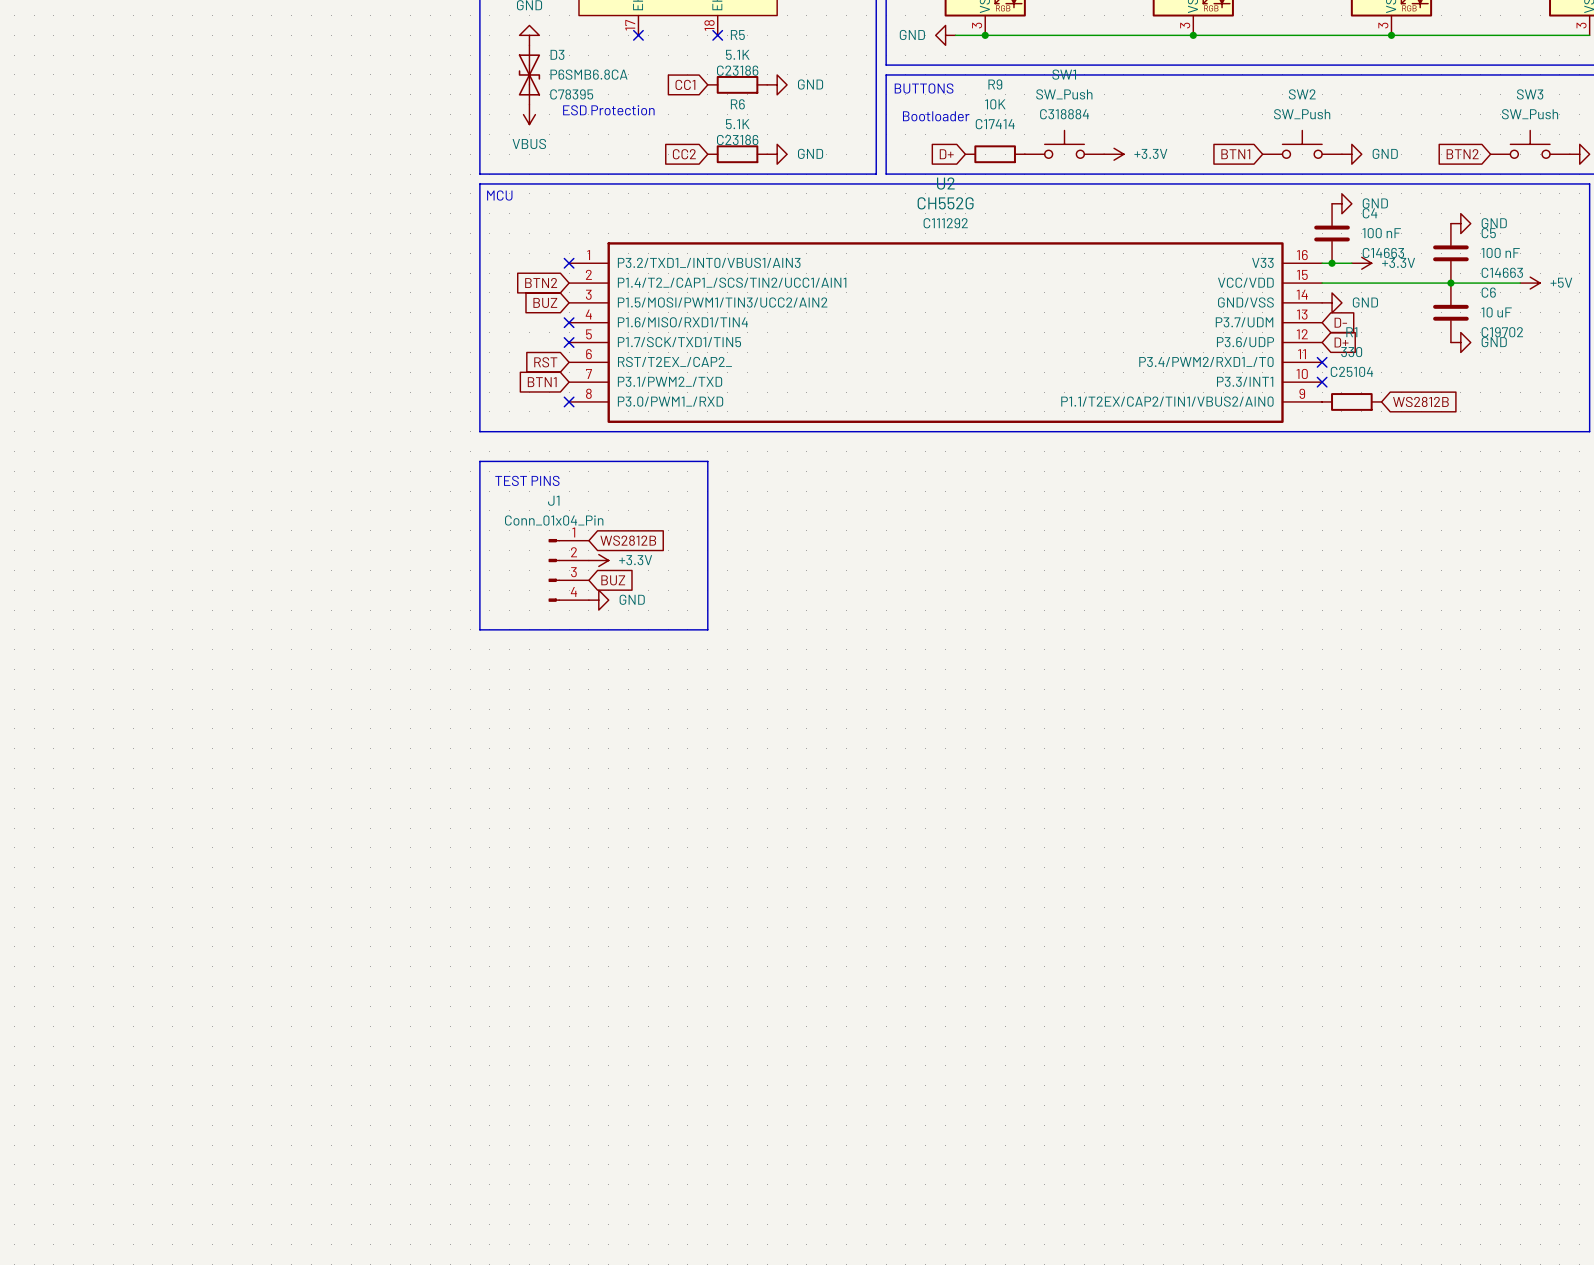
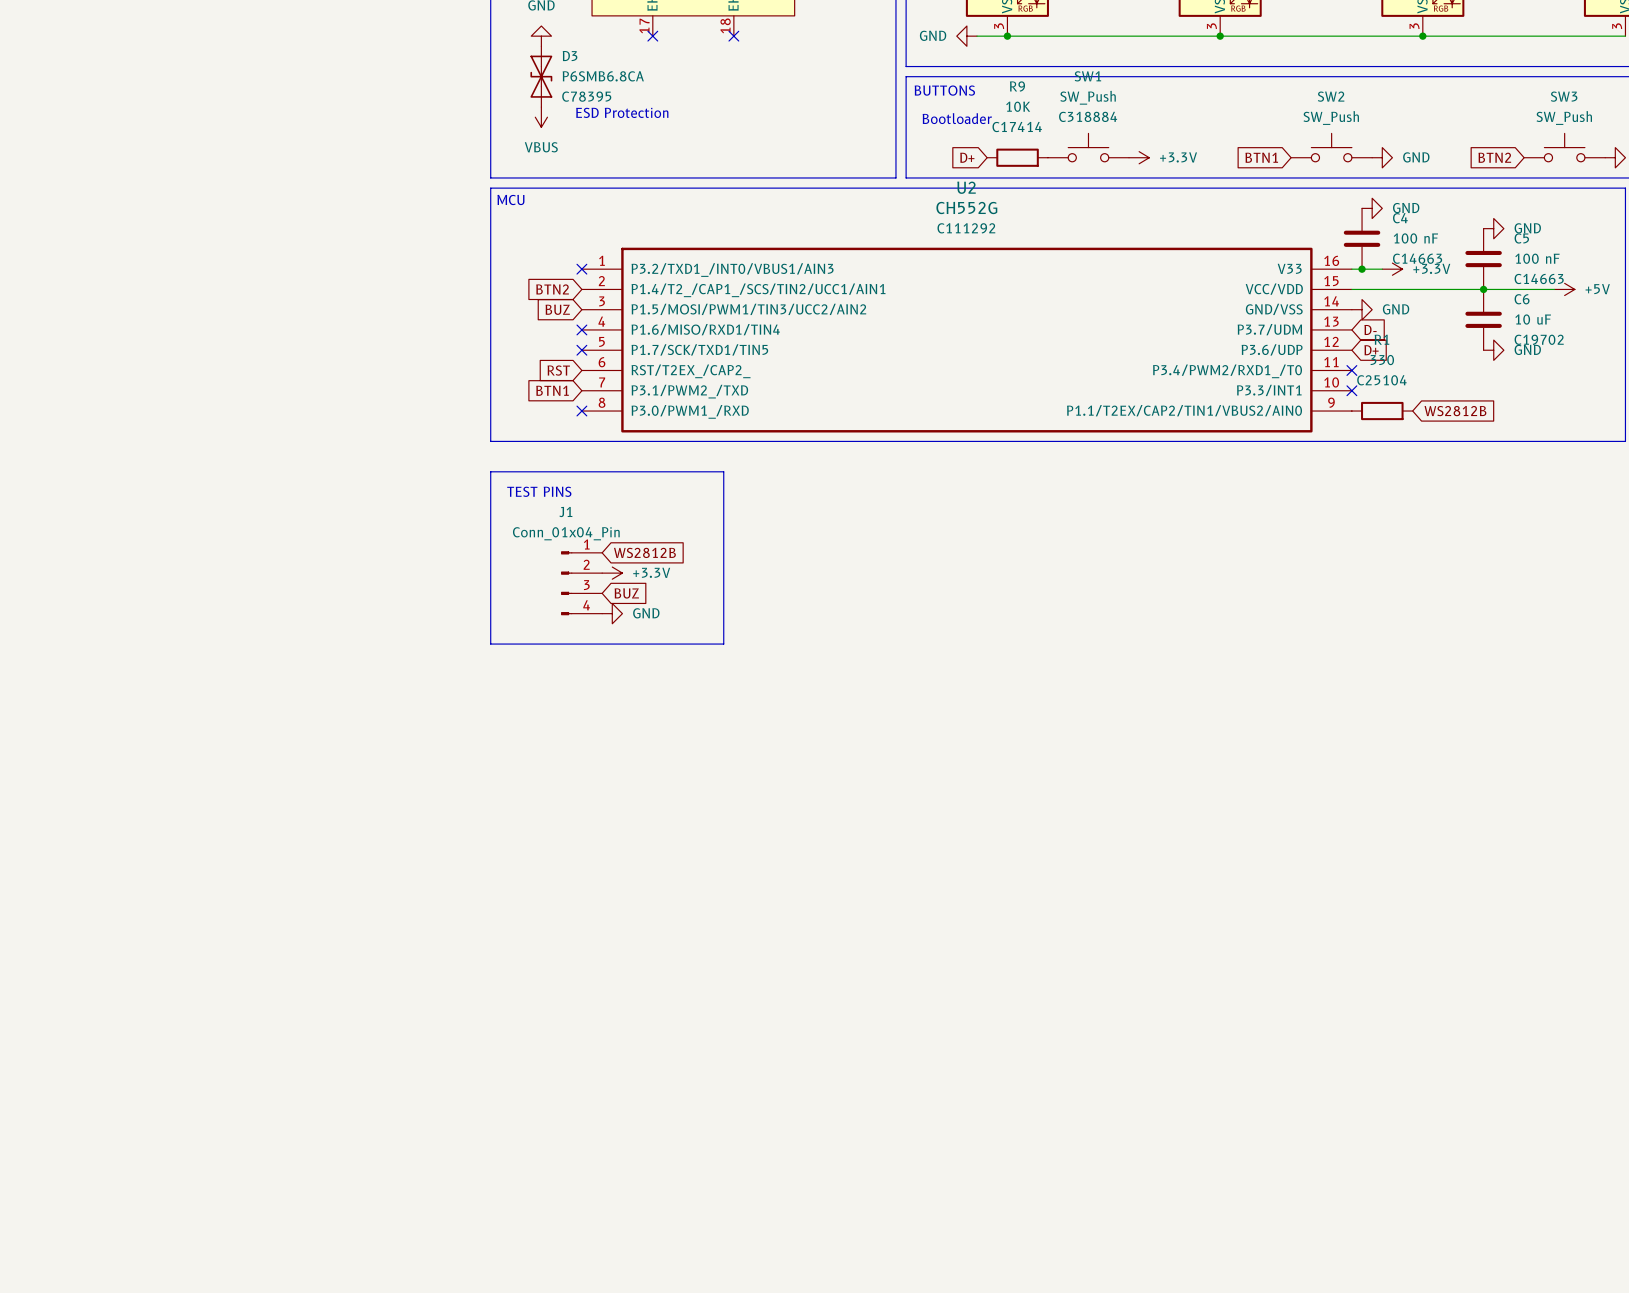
global label: CC1 (685, 84) -> none
R5: 5.1K (737, 84) -> none
power symbol: GND (777, 84) -> none
global label: CC2 (684, 154) -> none
R6: 5.1K (737, 154) -> none
power symbol: GND (777, 154) -> none

